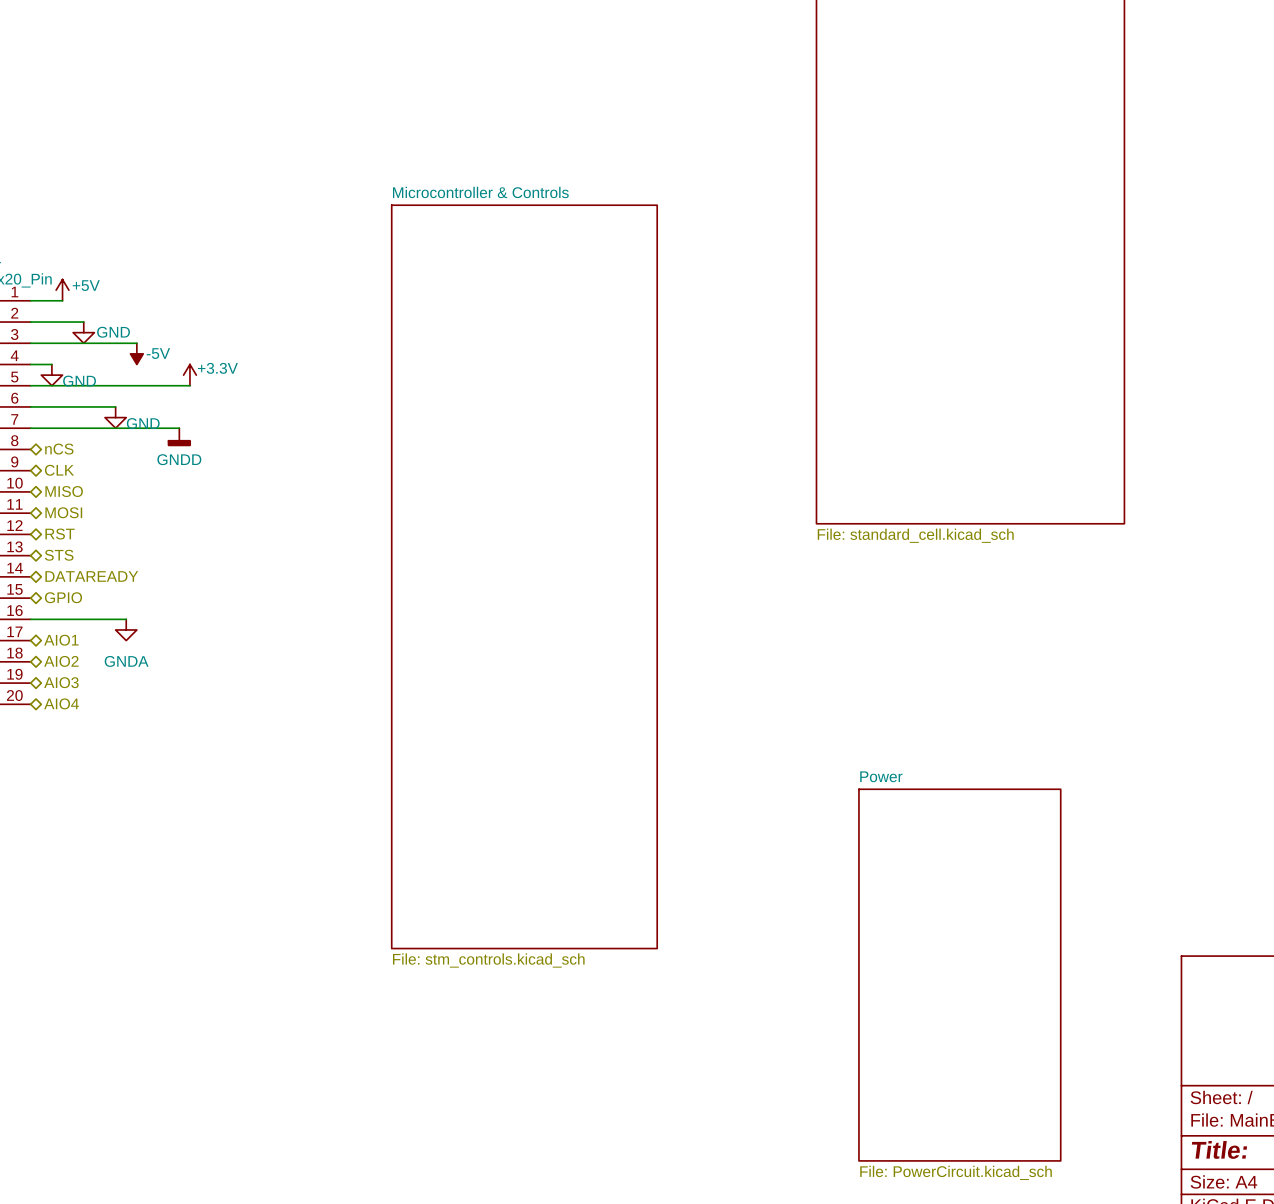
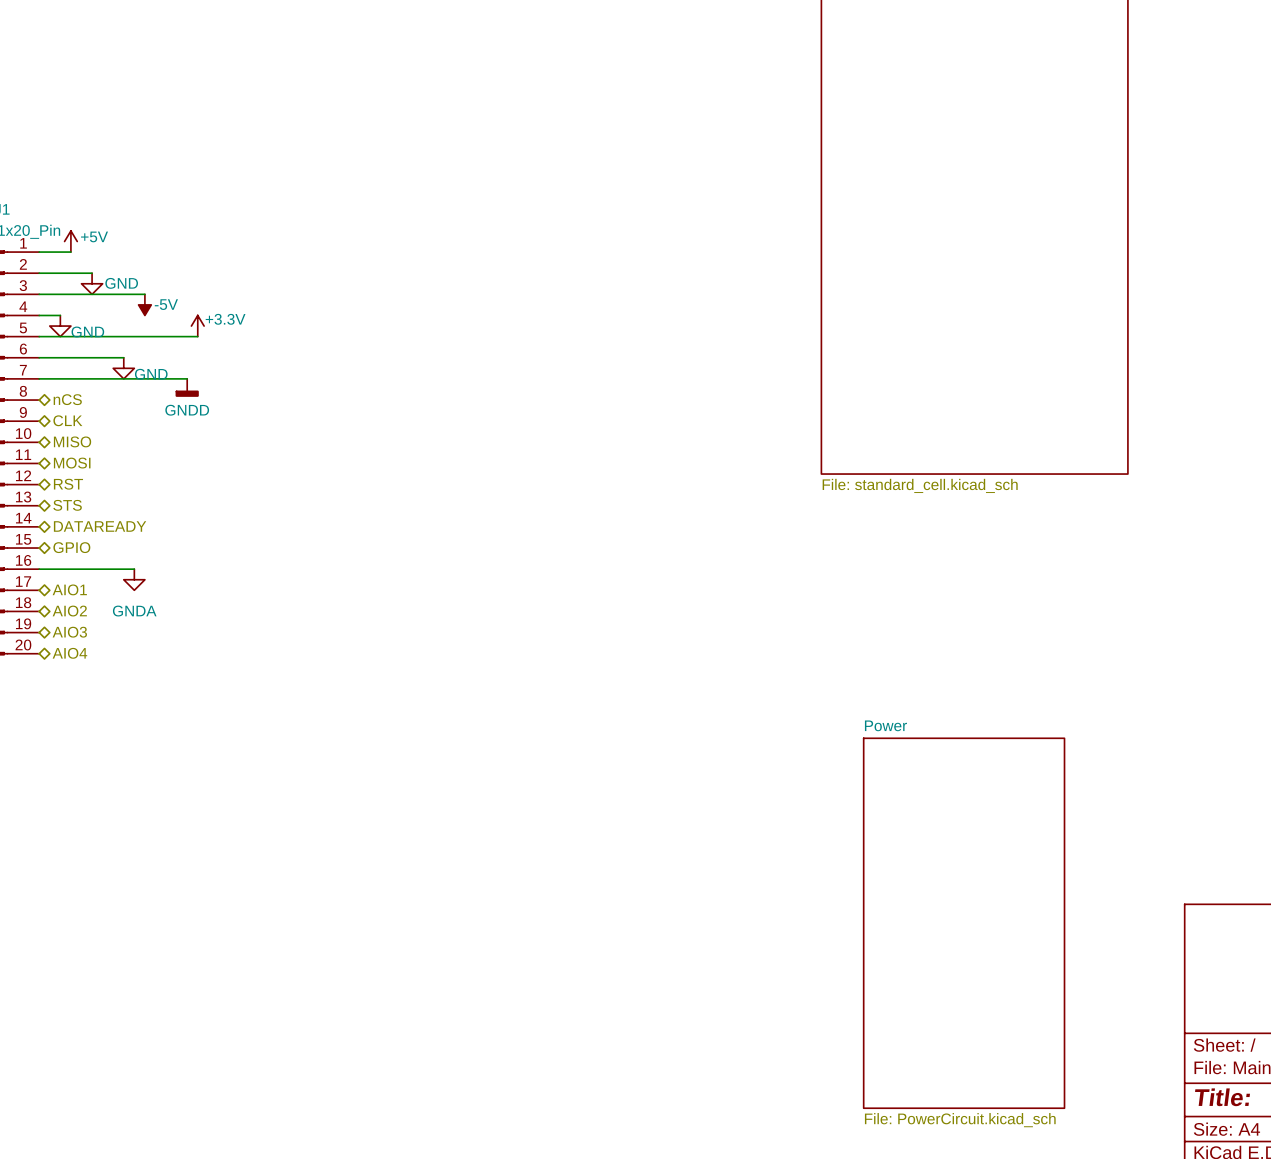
sheet Microcontroller & Controls: File: stm_controls.kicad_sch (524, 576) -> none

